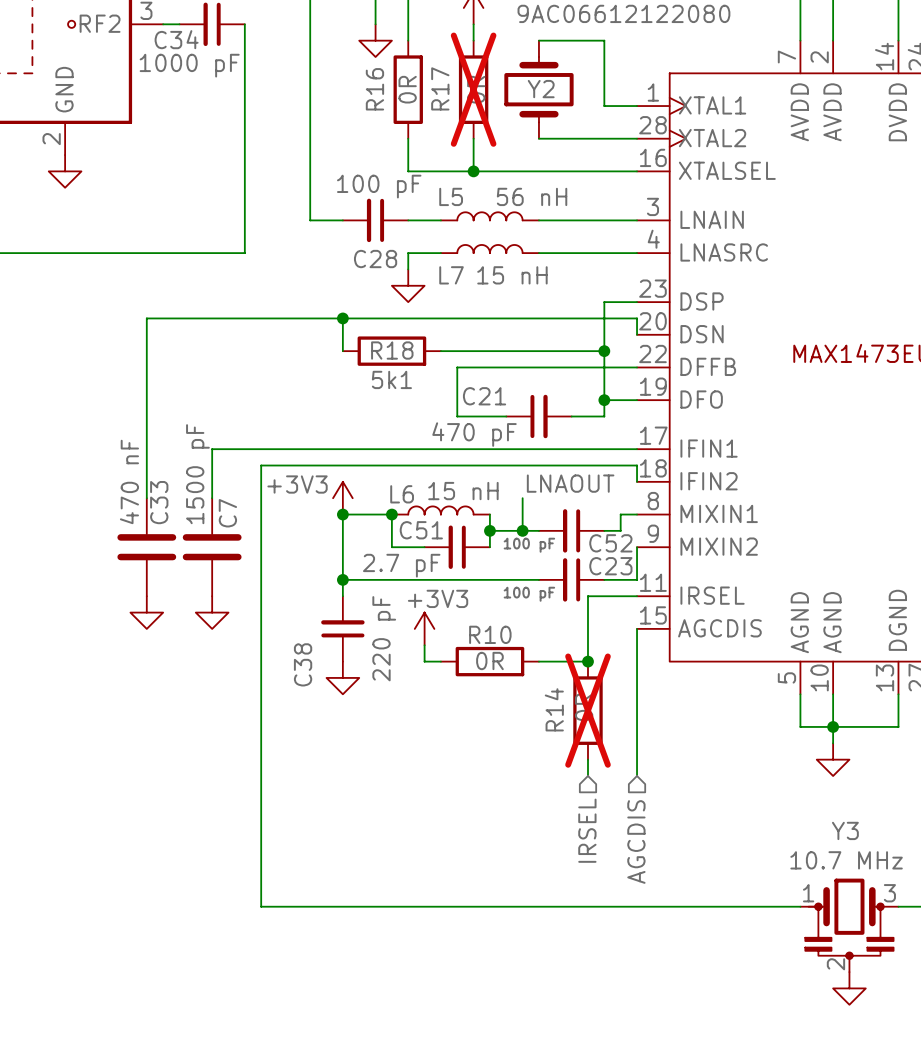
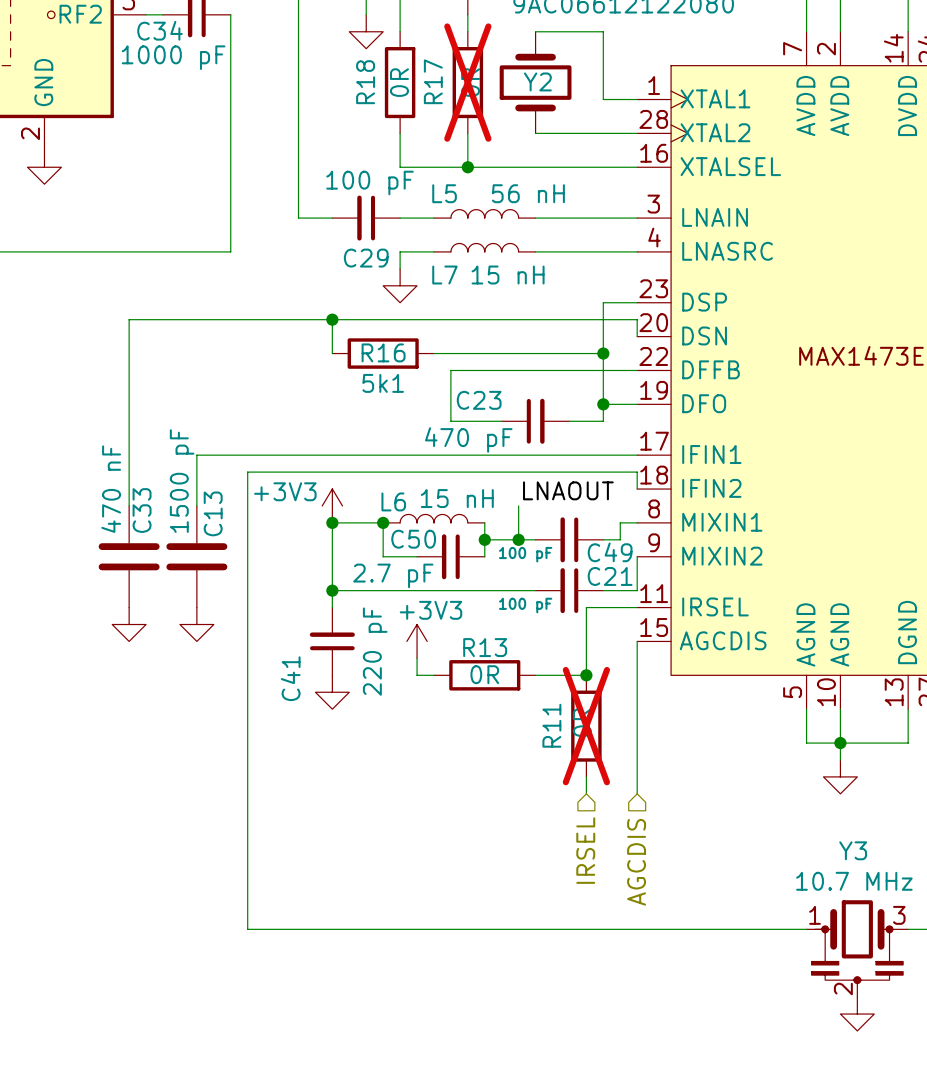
R16 name: R16 (374, 89) -> R18 (365, 82)
C28 name: C28 (375, 259) -> C29 (366, 258)
R18 name: R18 (392, 350) -> R16 (383, 352)
C21 name: C21 (484, 396) -> C23 (479, 400)
C7 name: C7 (227, 513) -> C13 (213, 513)
C51 name: C51 (421, 530) -> C50 (413, 539)
C52 name: C52 (610, 543) -> C49 (610, 552)
C23 name: C23 (610, 566) -> C21 (610, 576)
R10 name: R10 (490, 634) -> R13 (485, 647)
C38 name: C38 (303, 664) -> C41 (290, 678)
R14 name: R14 (554, 709) -> R11 (551, 725)

